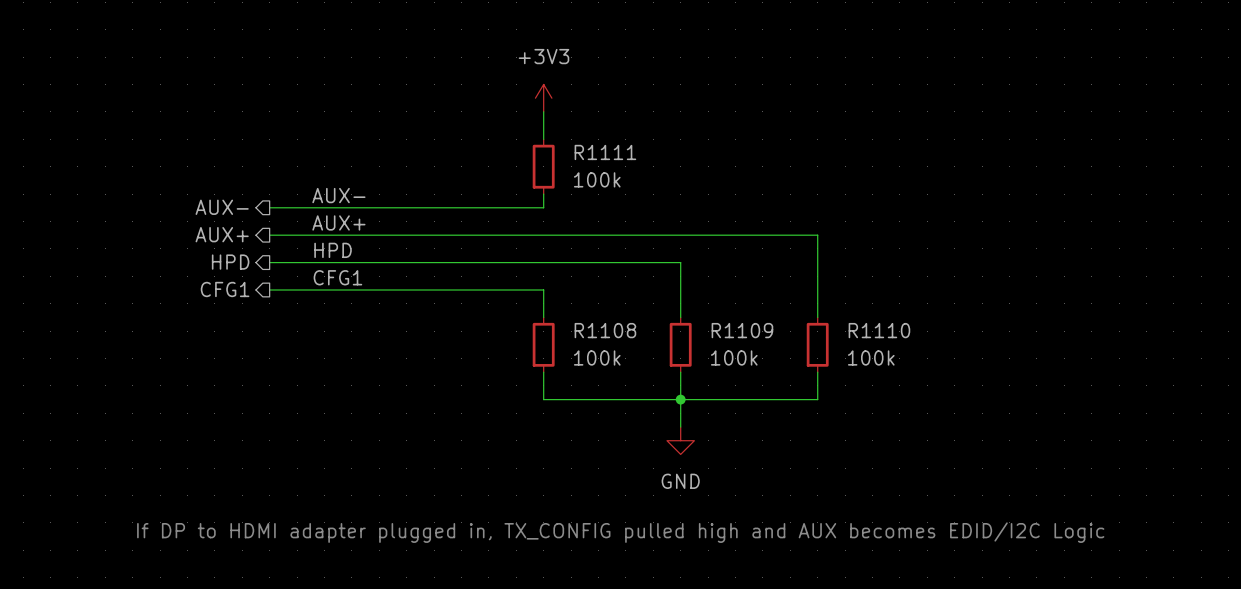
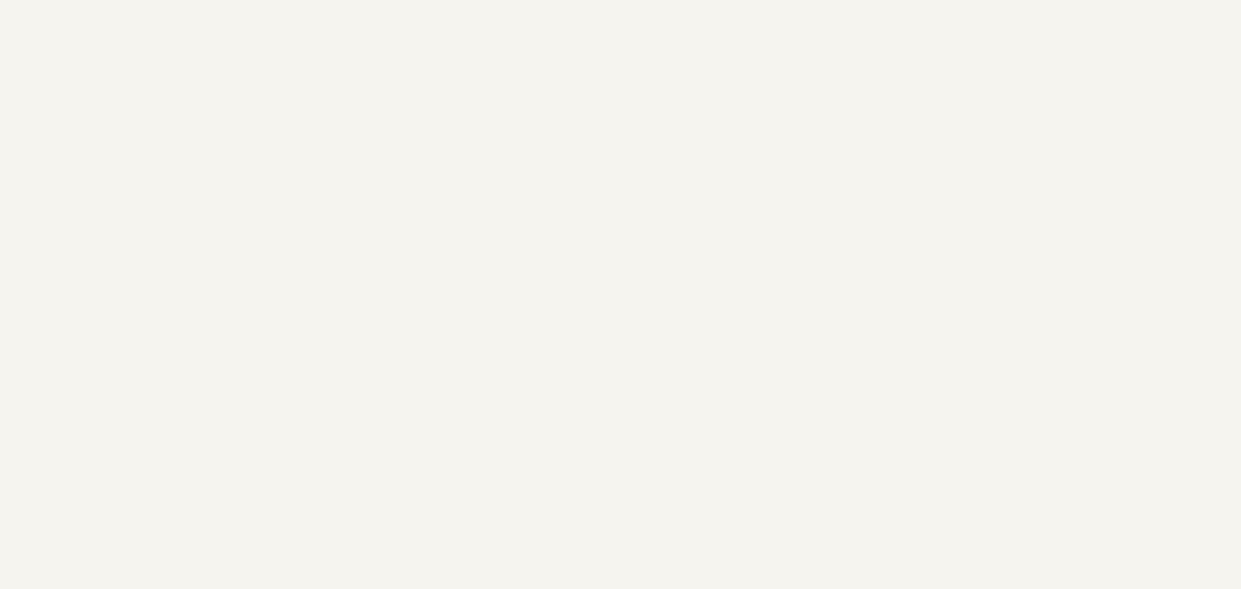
power symbol: +3V3 (543, 98) -> none
wire: (543, 111) (543, 139) -> none
R1111: (543, 166) -> none
wire: (543, 194) (543, 207) (269, 207) -> none
label: AUX- (338, 195) -> none
hierarchical label: AUX- (222, 207) -> none
label: AUX+ (338, 222) -> none
hierarchical label: AUX+ (222, 234) -> none
wire: (269, 235) (817, 235) (817, 317) -> none
label: HPD (333, 250) -> none
hierarchical label: HPD (230, 262) -> none
wire: (269, 262) (680, 262) (680, 317) -> none
label: CFG1 (337, 277) -> none
hierarchical label: CFG1 (225, 289) -> none
wire: (269, 289) (543, 289) (543, 317) -> none
R1108: (543, 344) -> none
R1109: (680, 344) -> none
R1110: (817, 344) -> none
wire: (543, 372) (543, 399) (817, 399) (817, 372) -> none
wire: (680, 372) (680, 427) -> none
junction: (680, 399) -> none
power symbol: GND (680, 440) -> none
text: If DP to HDMI adapter plugged in, TX_CONFIG pulled high and AUX becomes EDID/I2C Logic (620, 532) -> none

